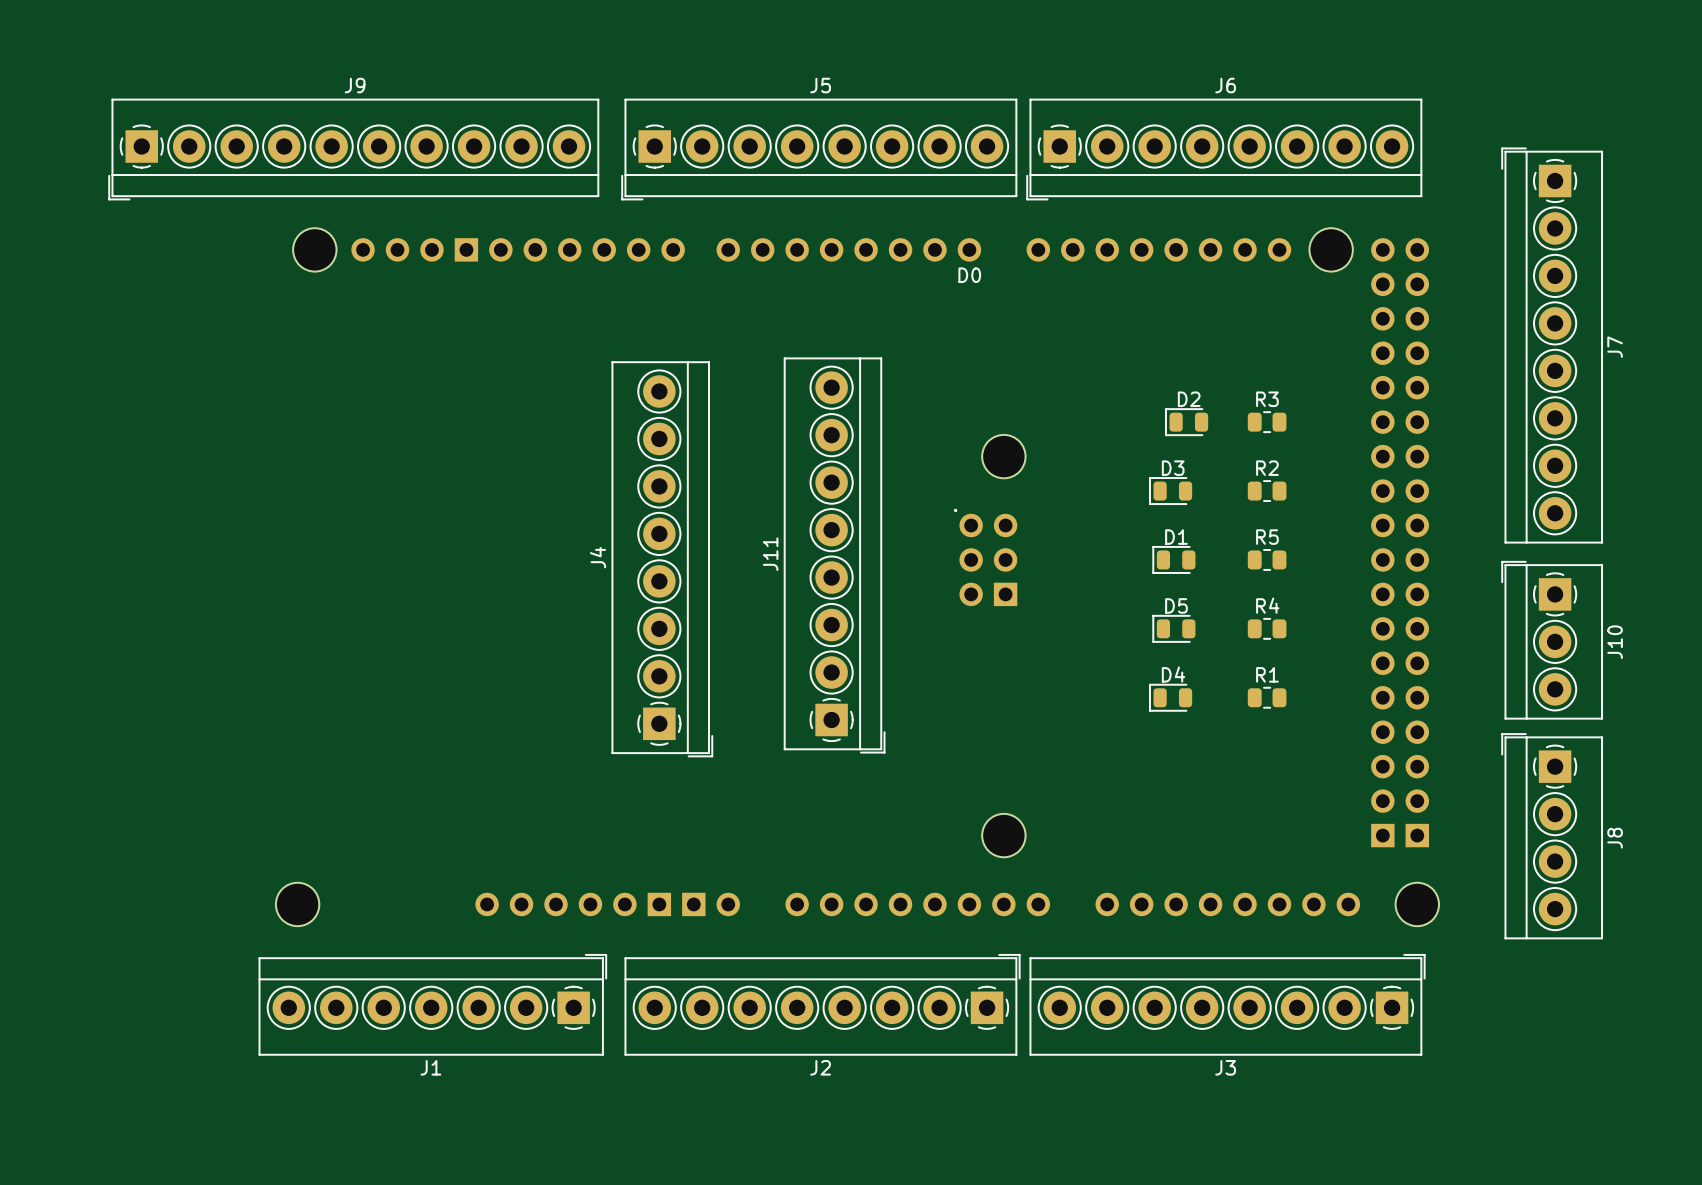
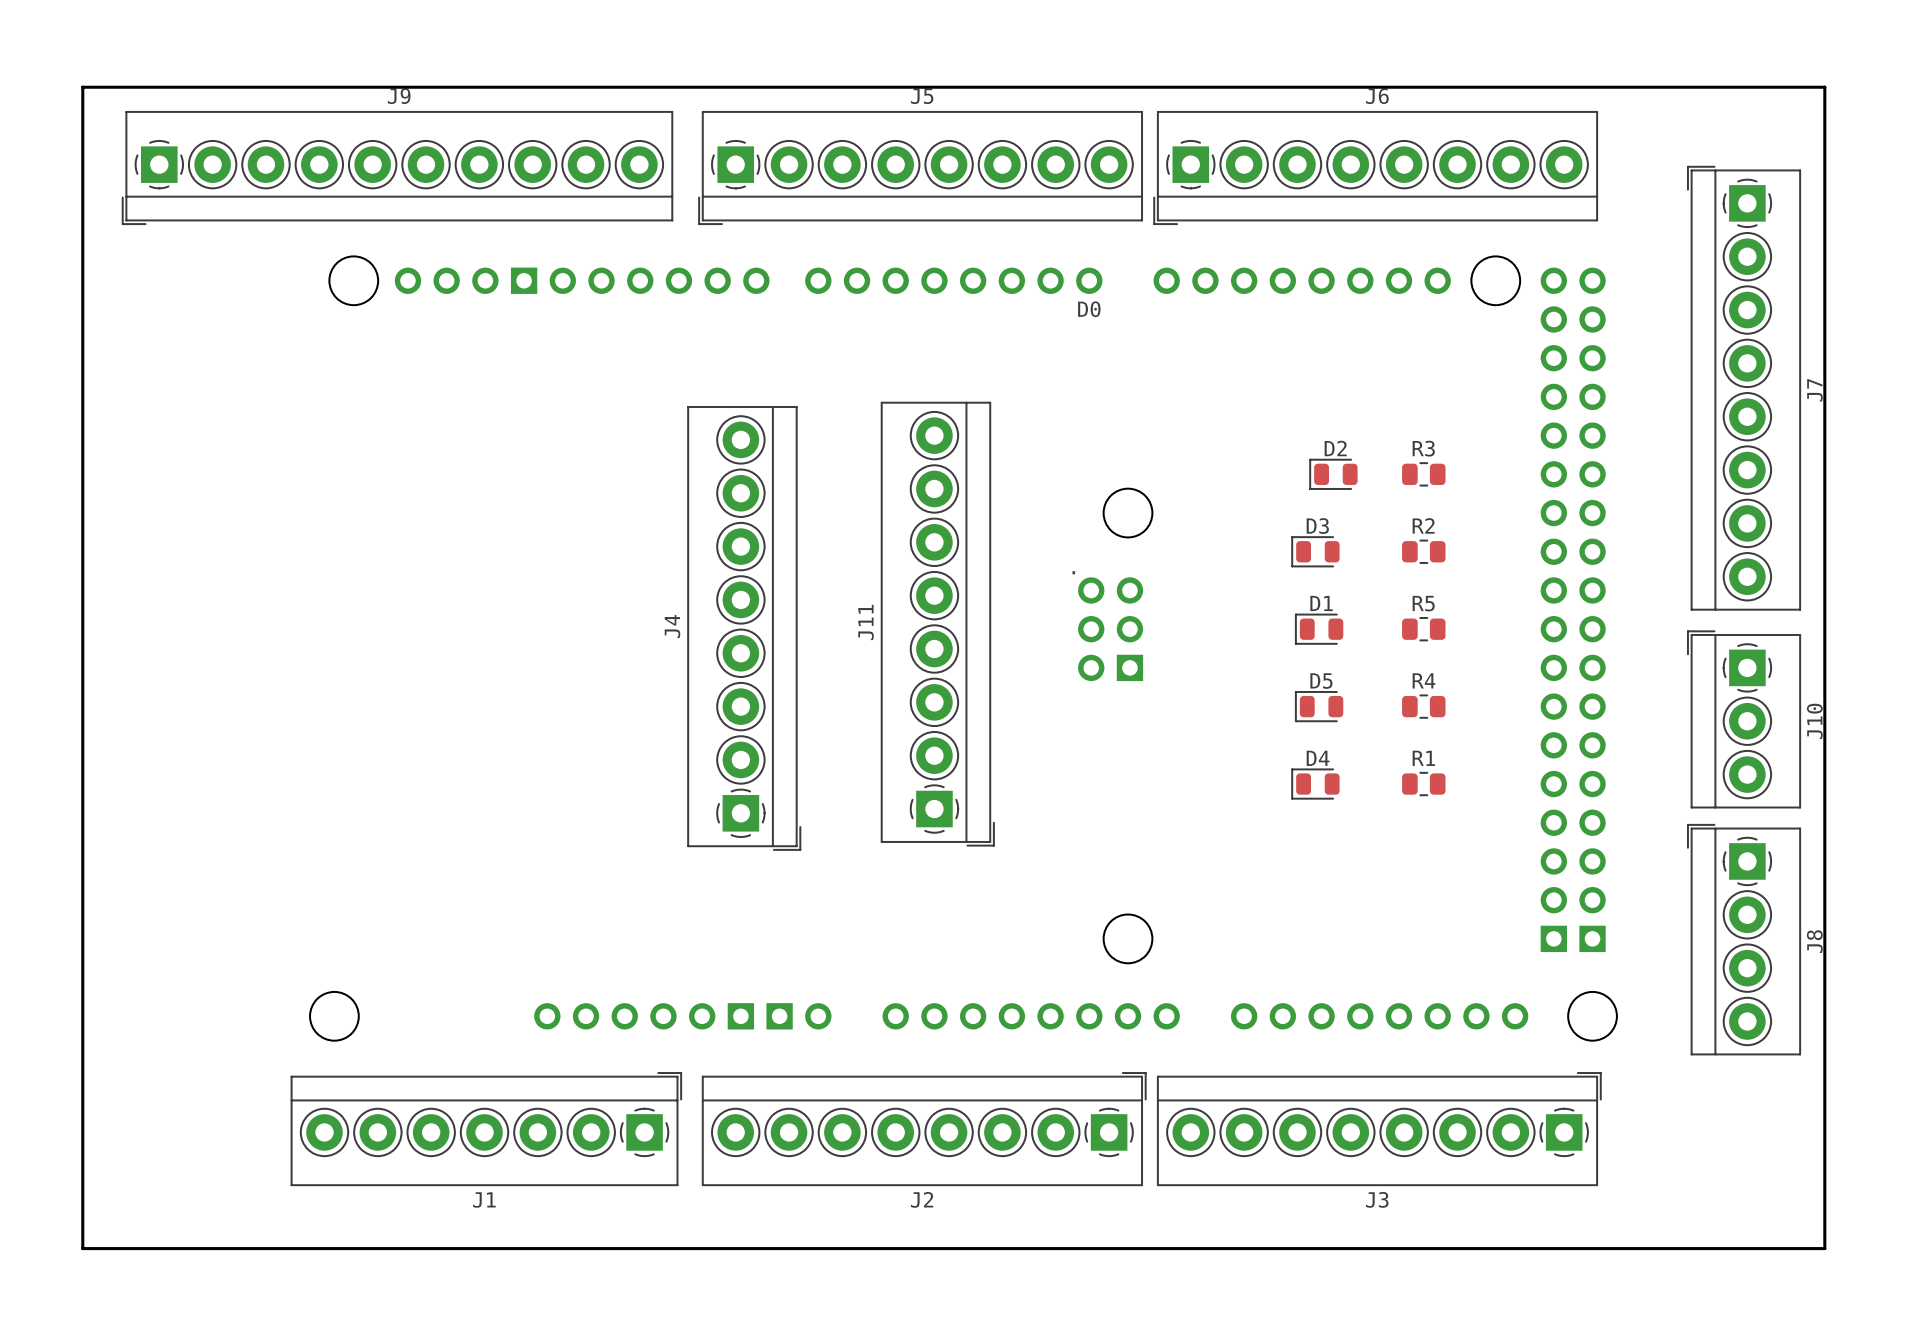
board edge: none -> (82, 87) (1824, 87) (1824, 1248) (82, 1248) (82, 87)

